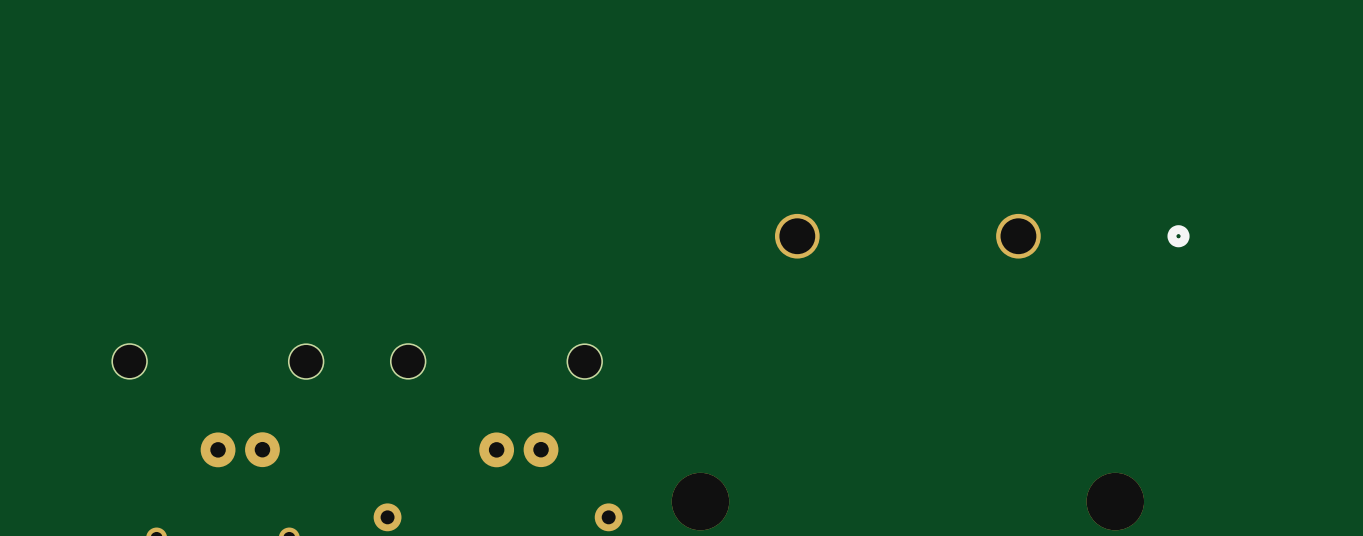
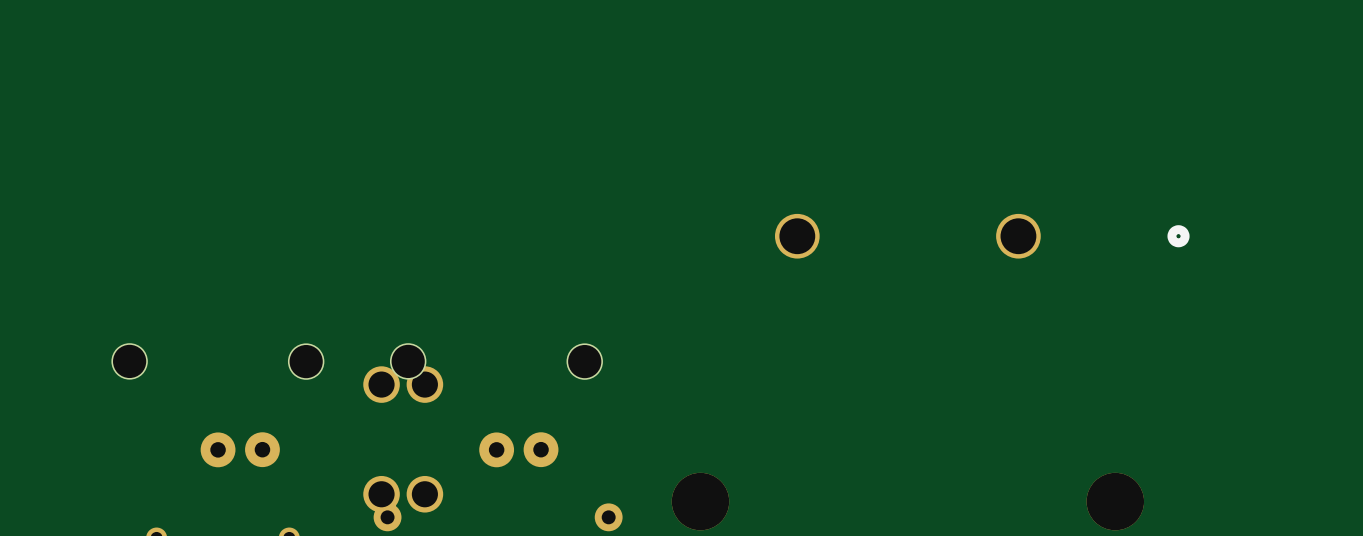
part: none -> (403, 384)
part: none -> (403, 494)

